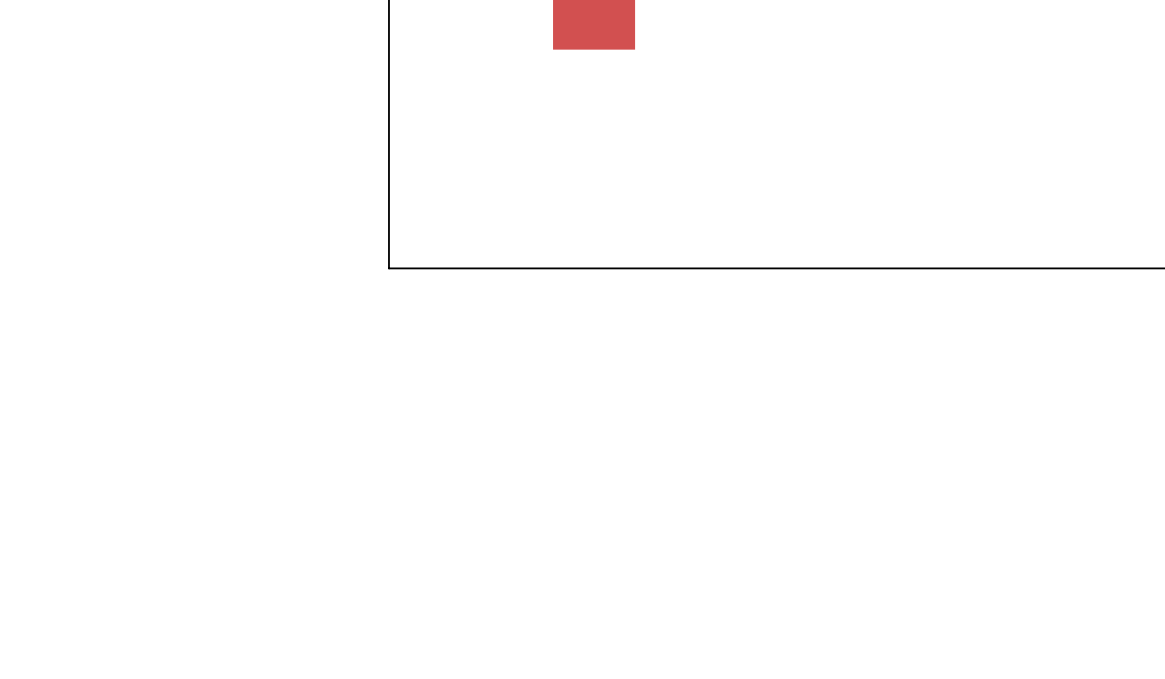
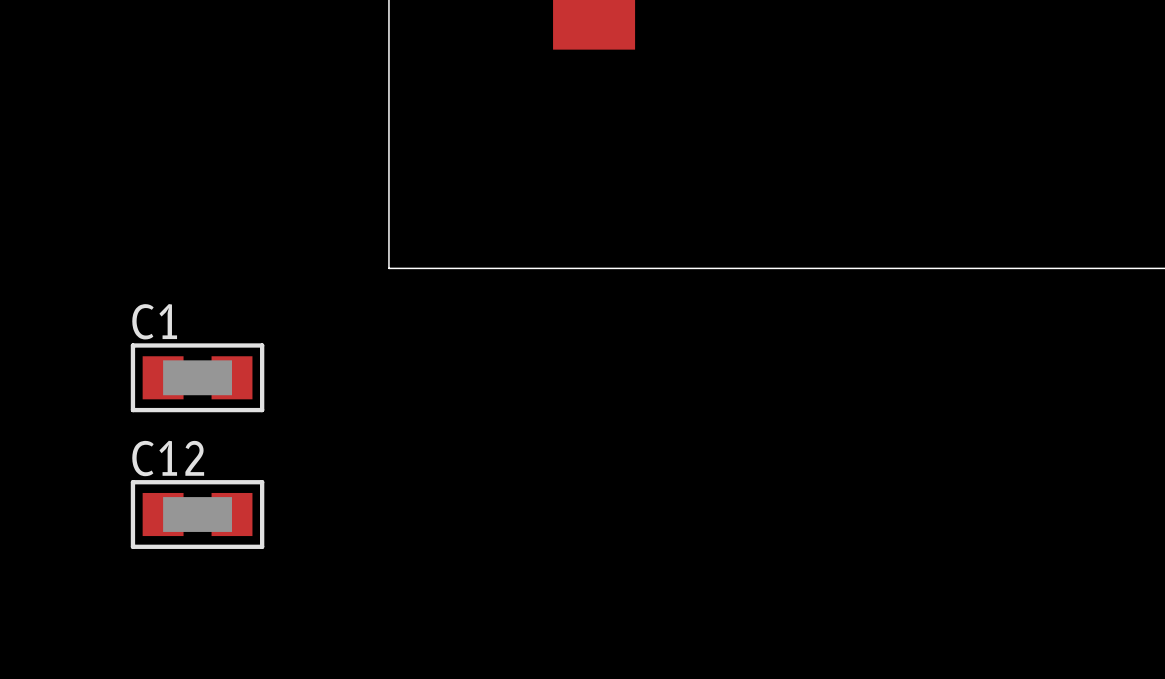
C1: none -> (197, 377)
C12: none -> (197, 514)

